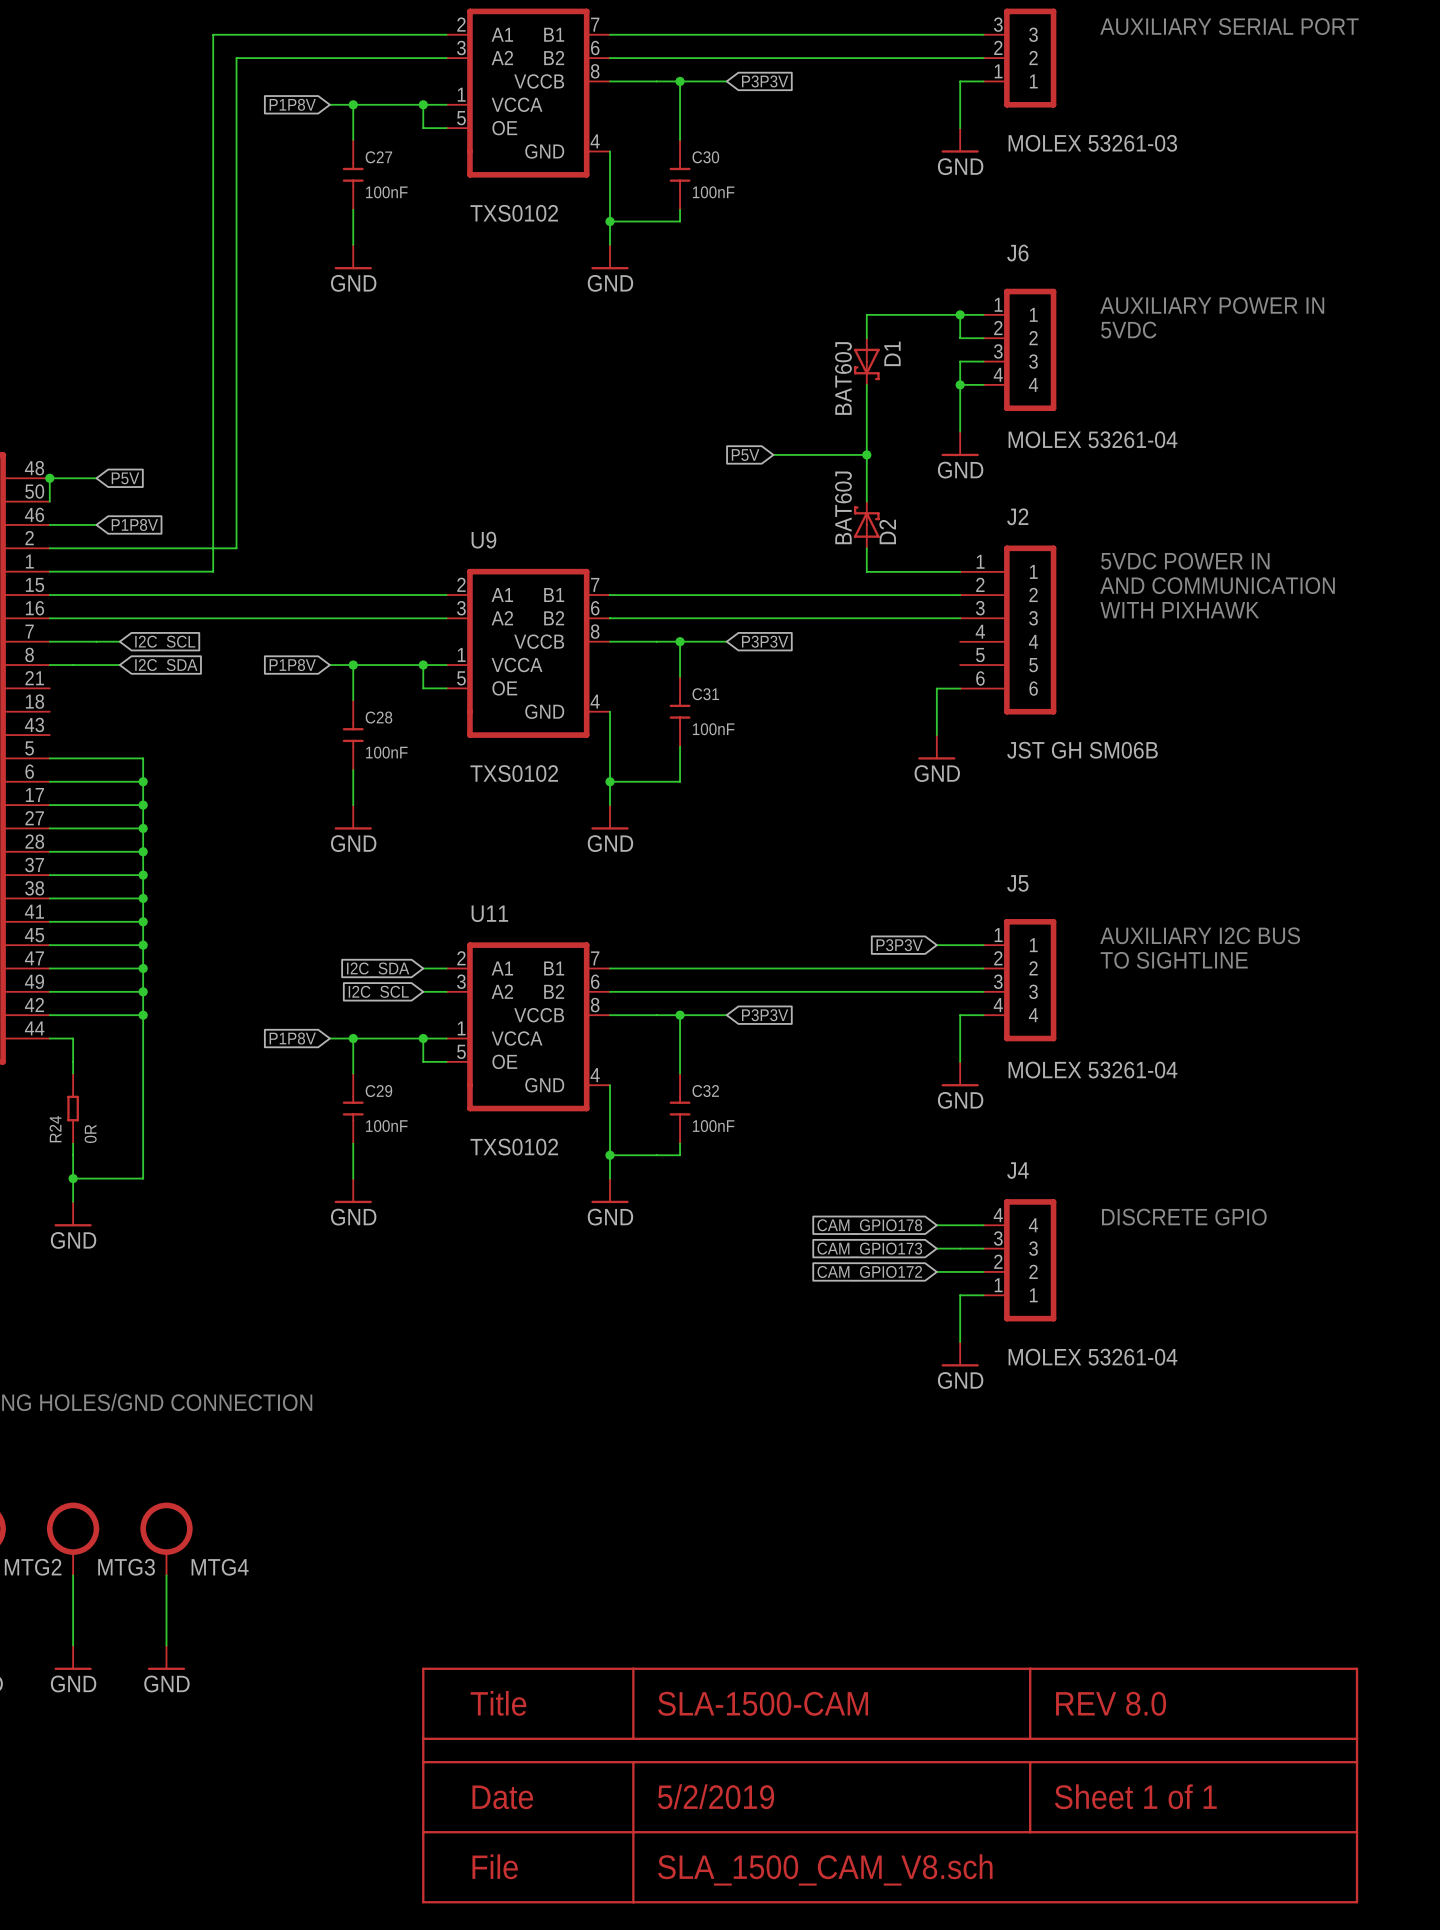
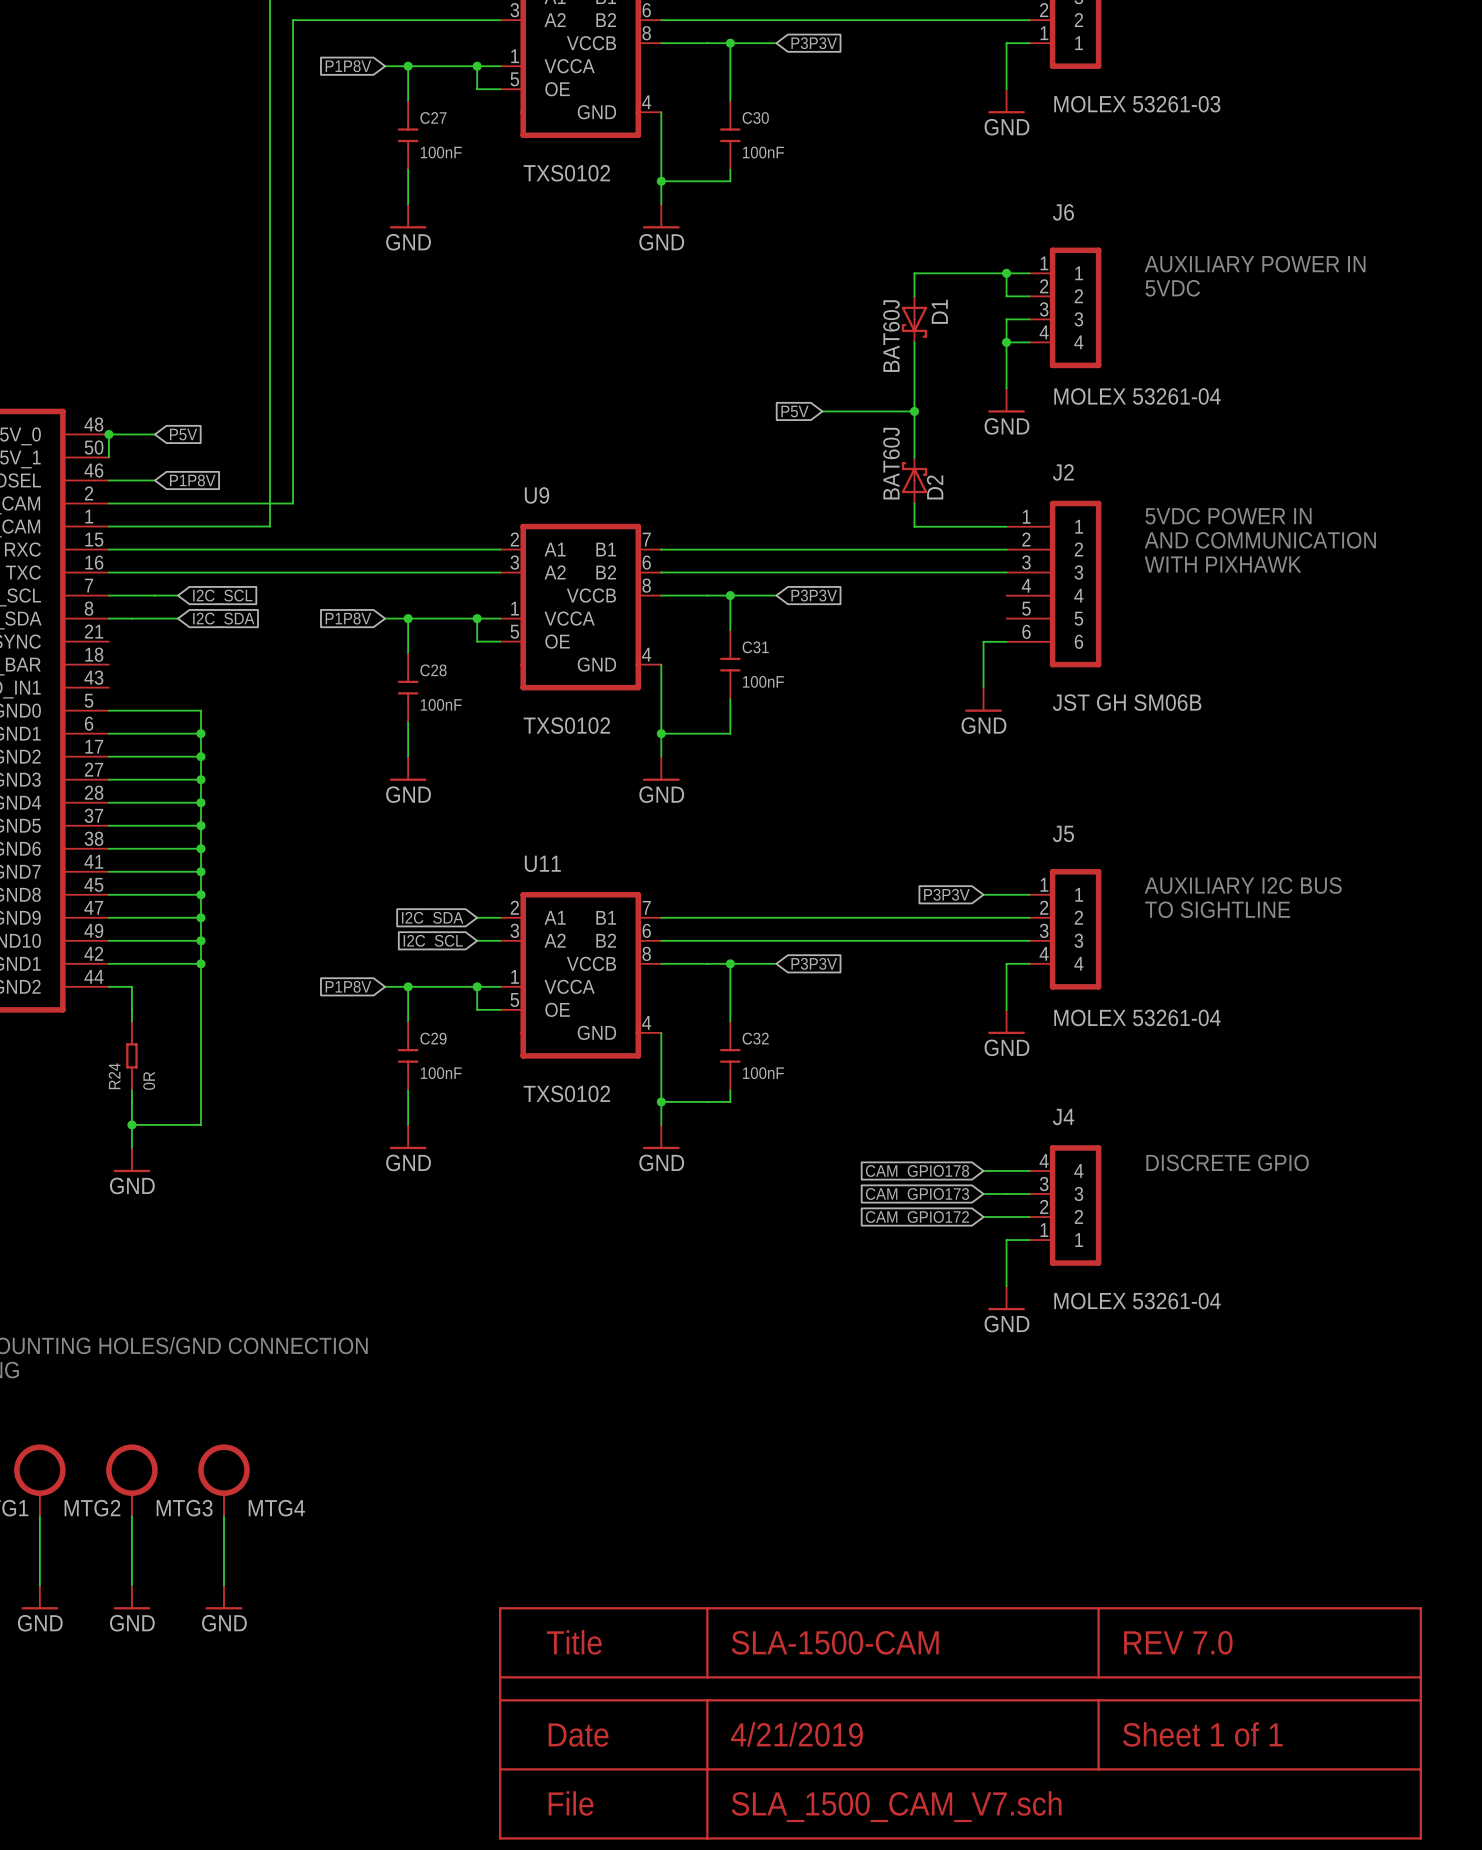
part: (890, 1785) -> none
part: none -> (960, 1723)

